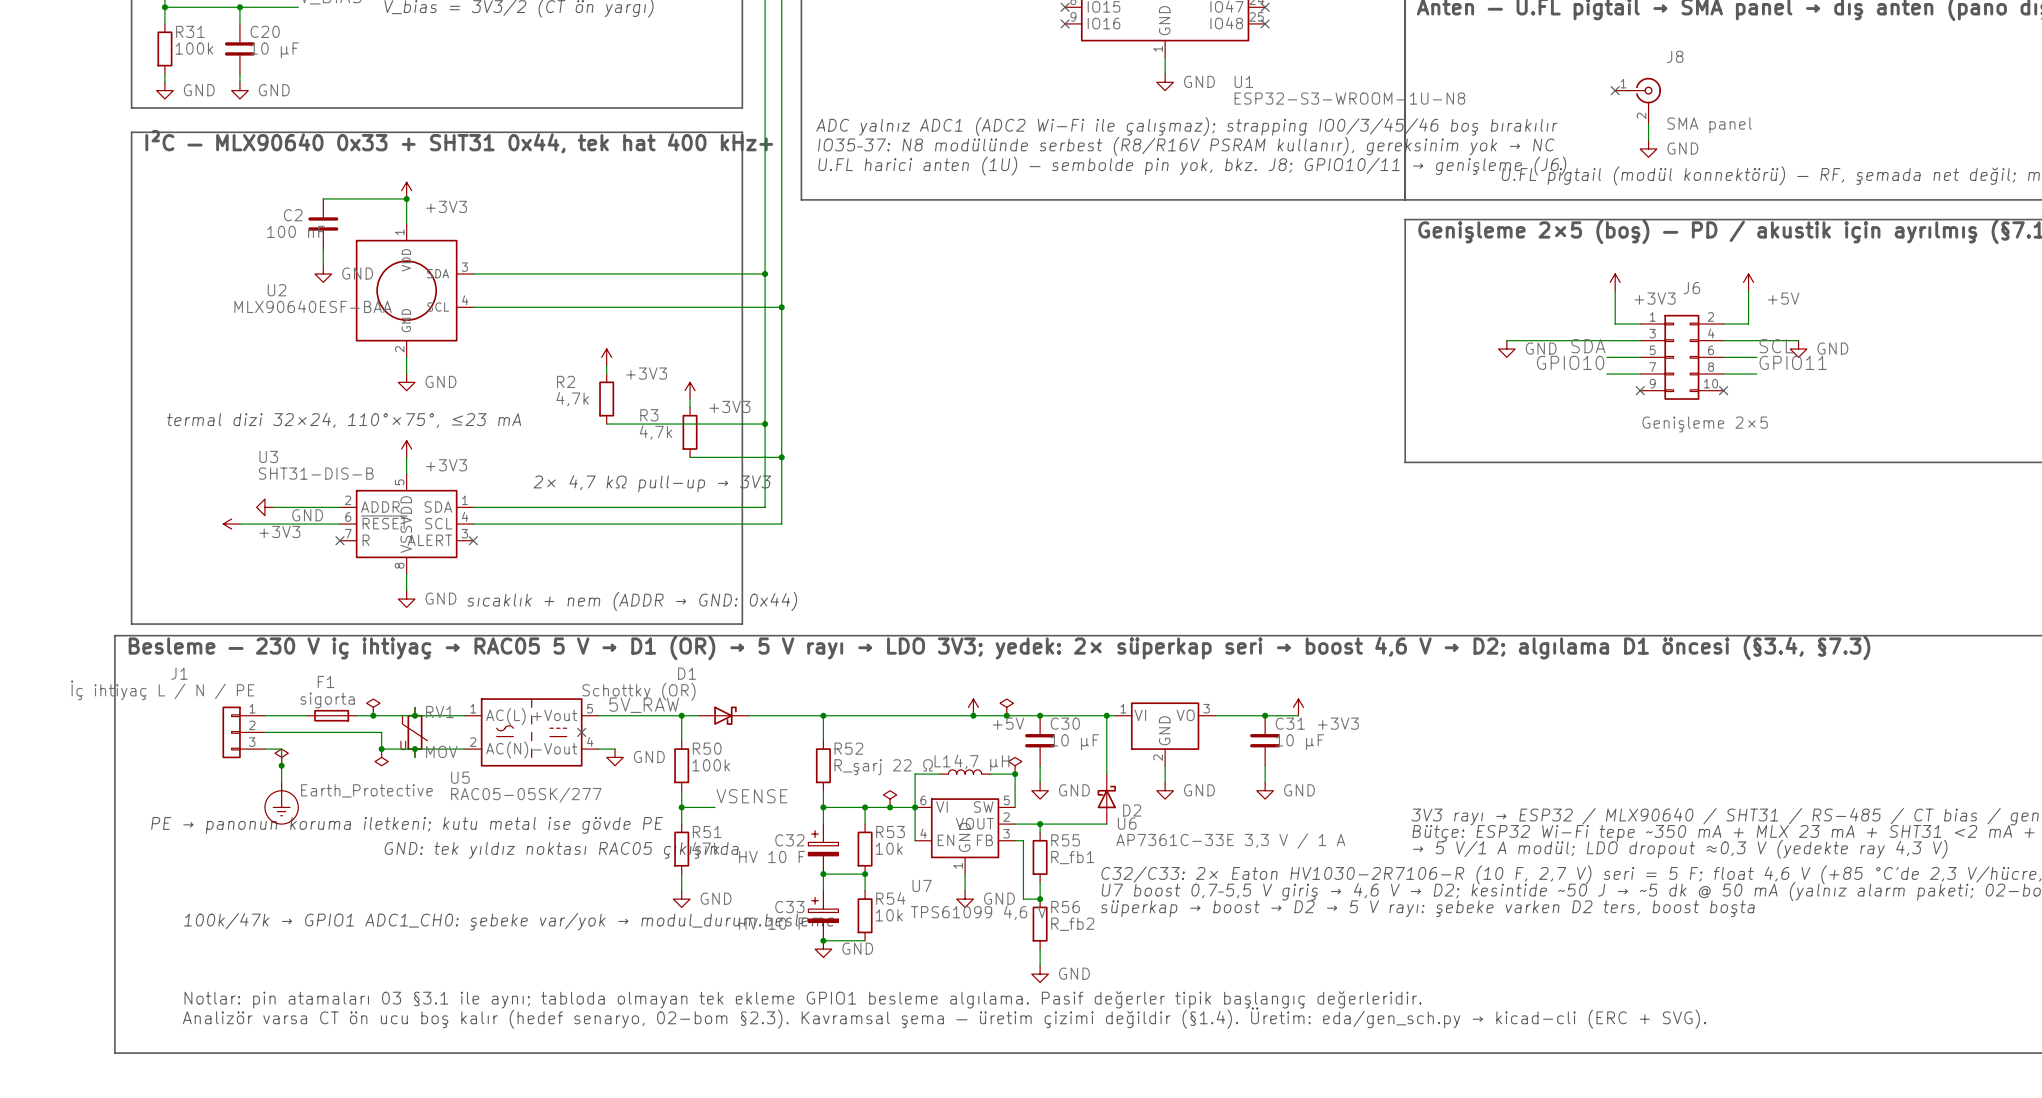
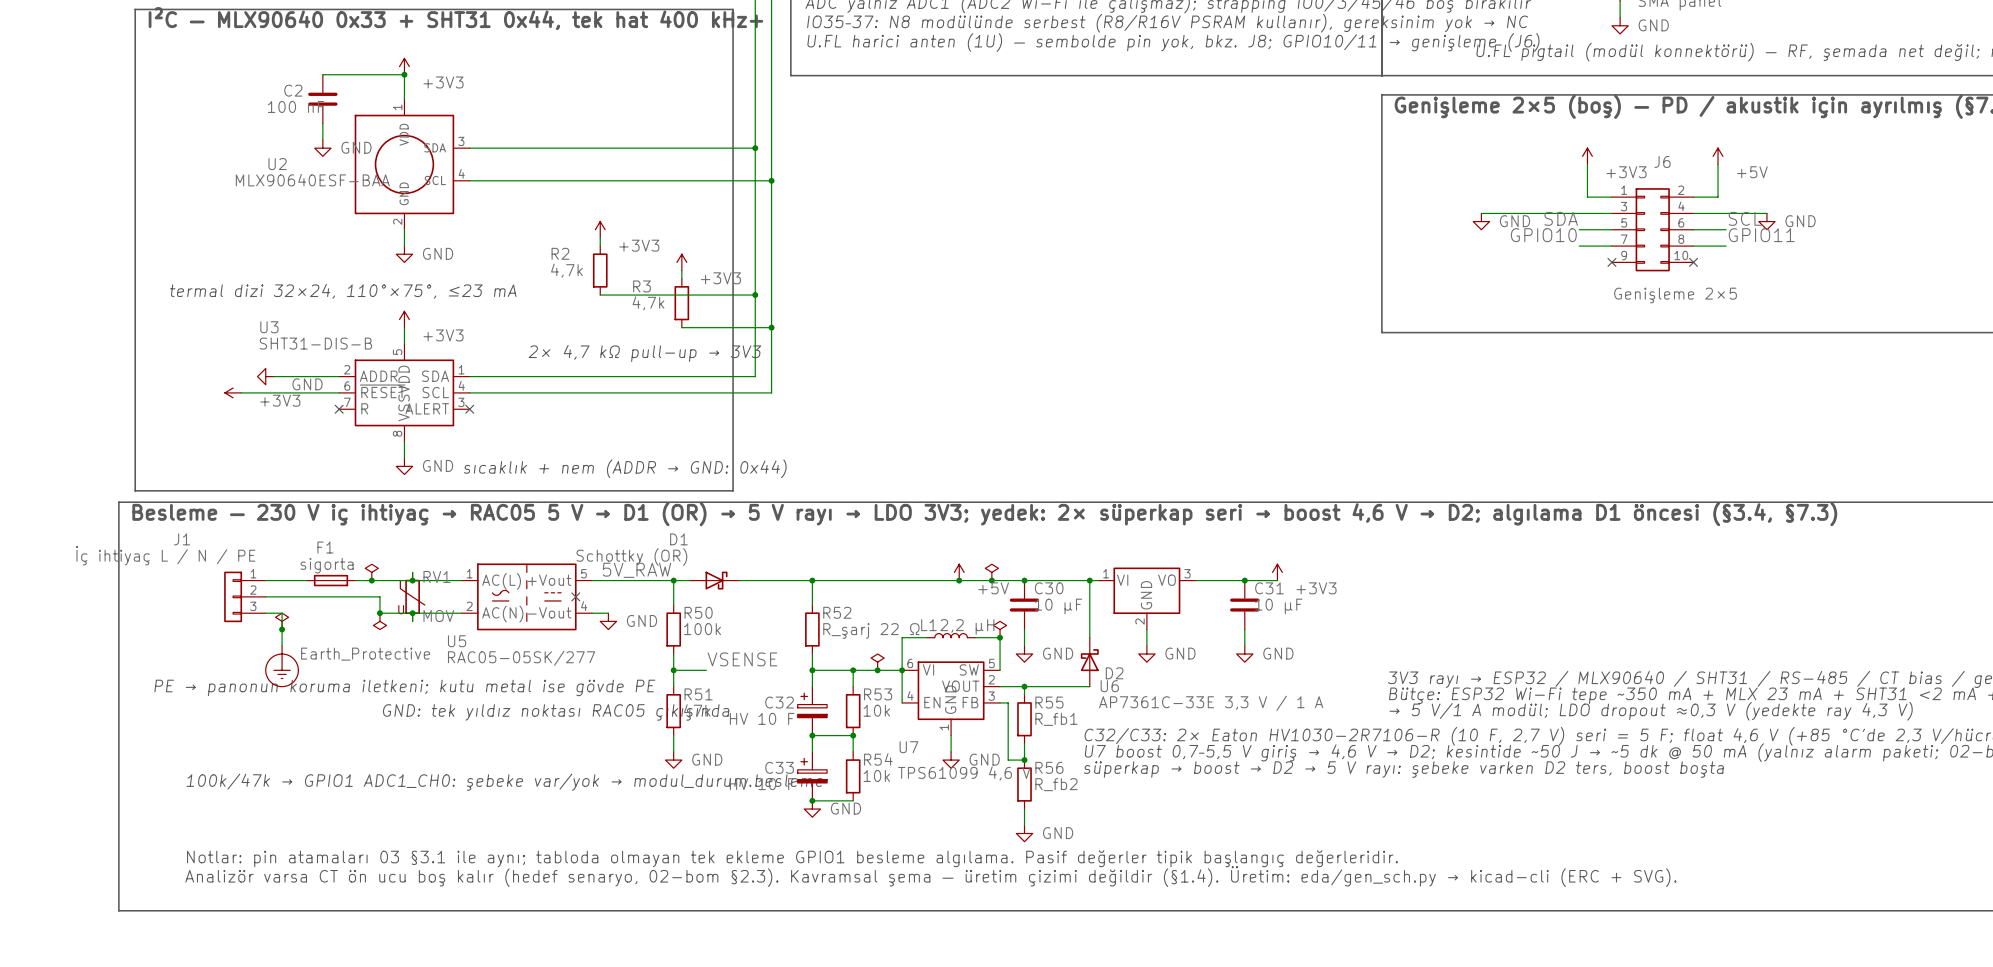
L1 value: 4,7 µH (981, 762) -> 2,2 µH (967, 626)

